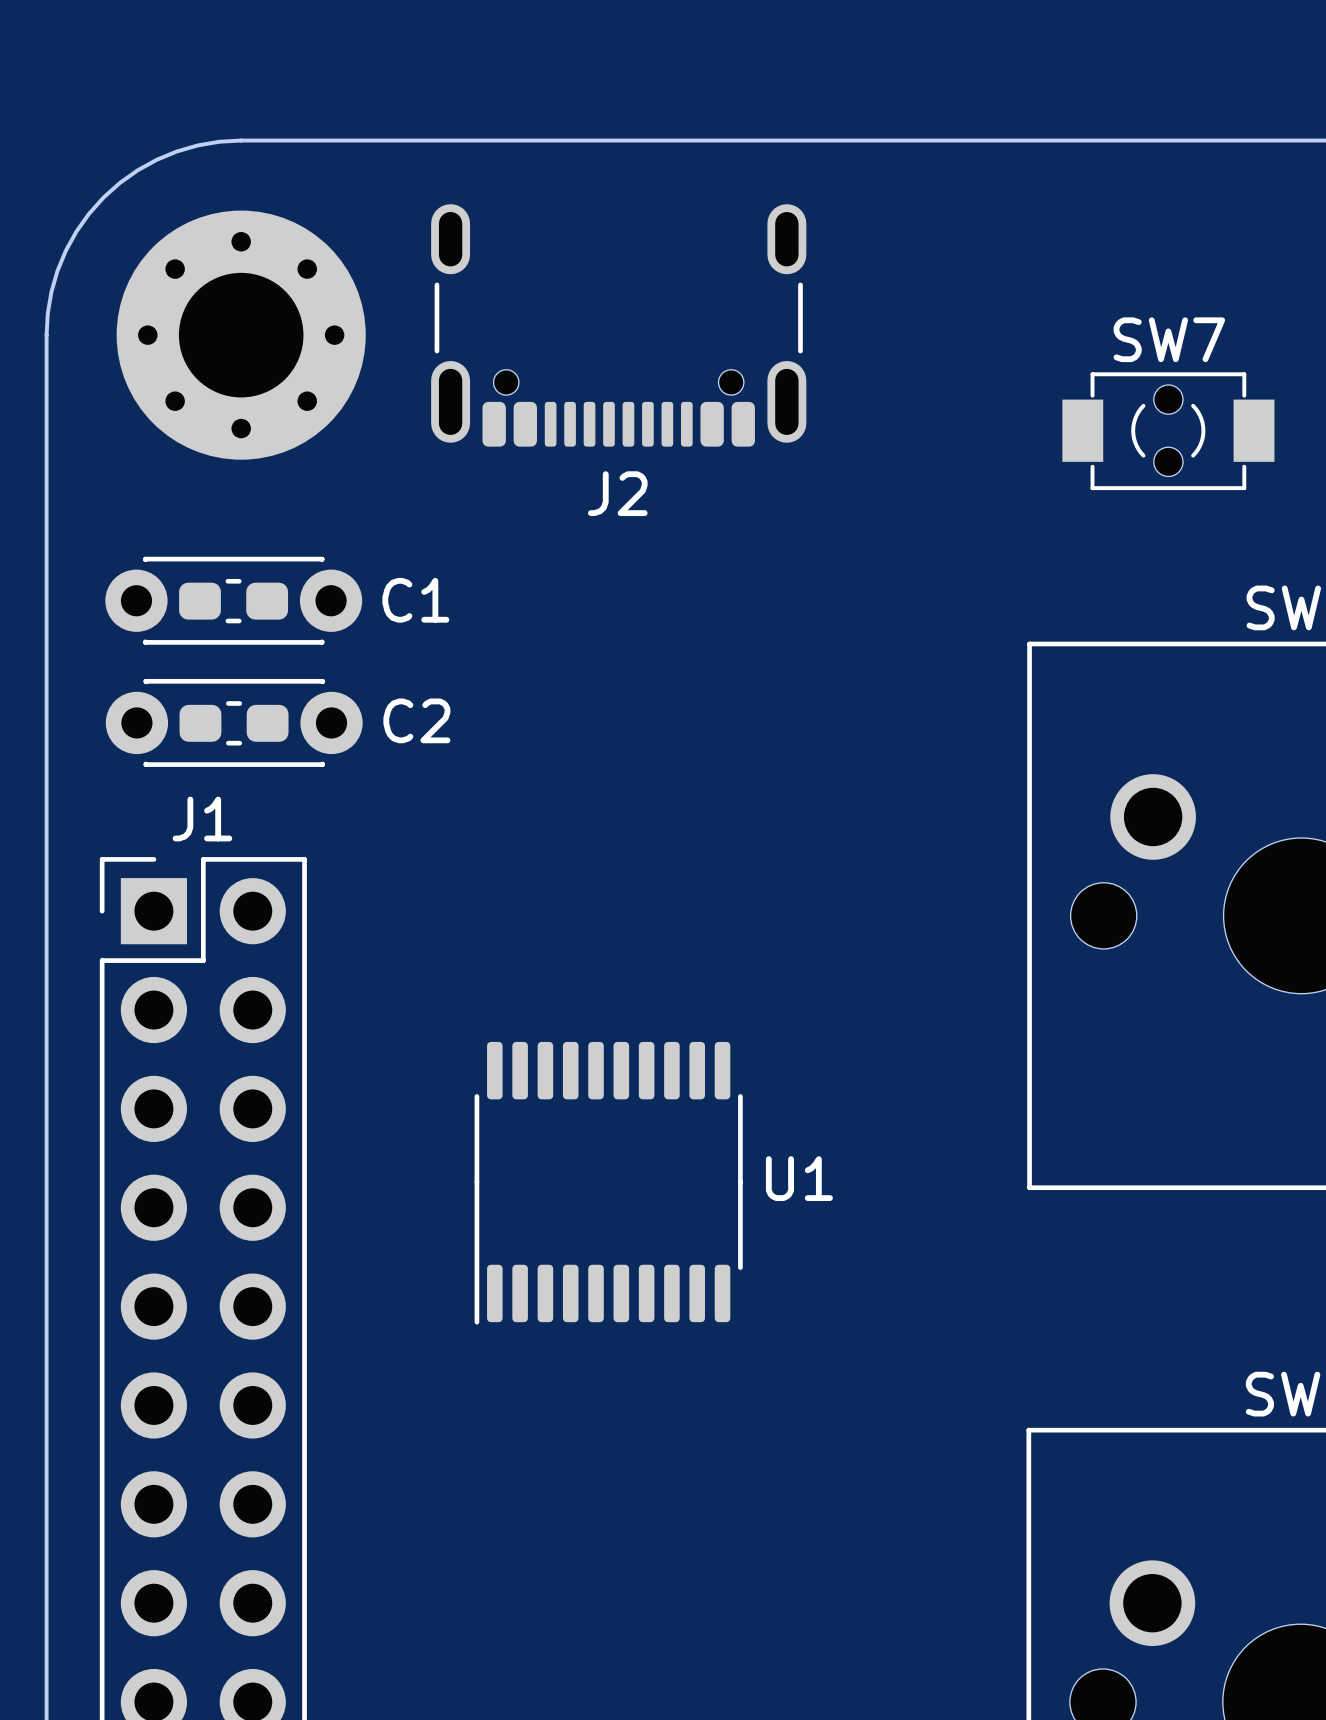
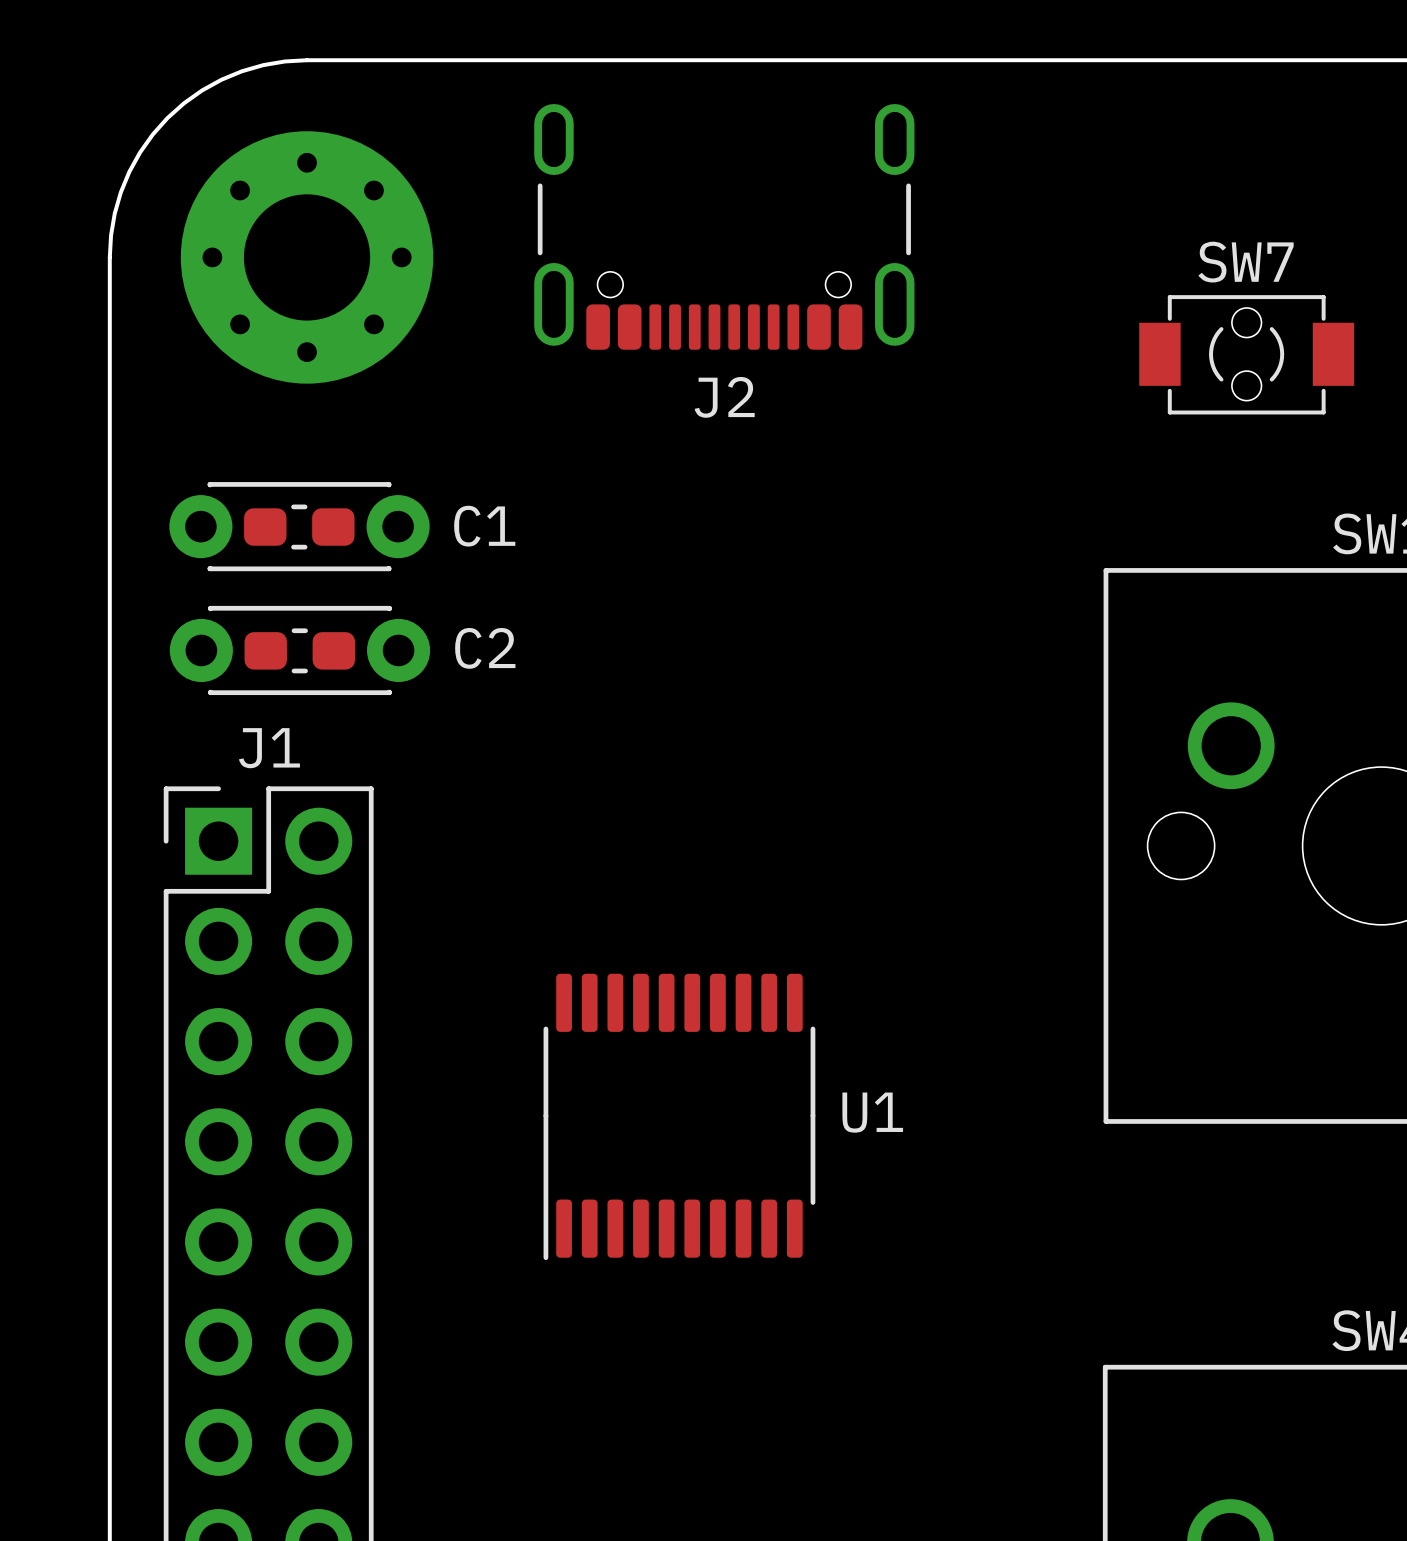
J2 position: (618, 325) -> (724, 226)

